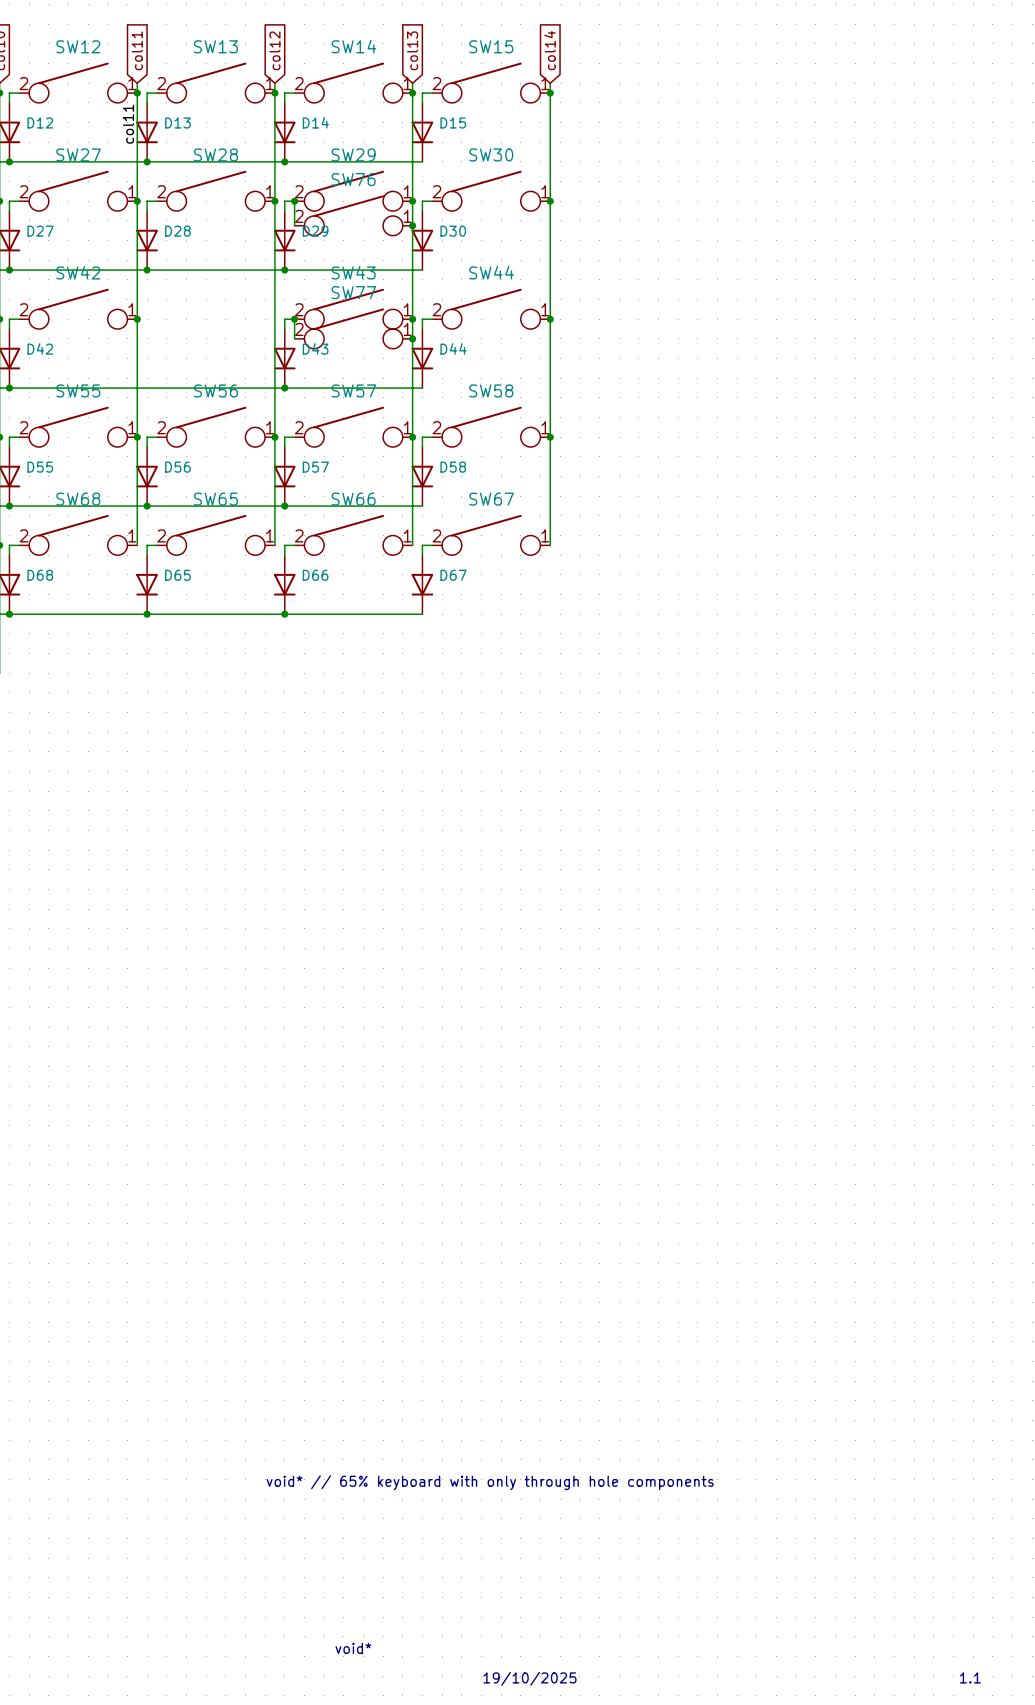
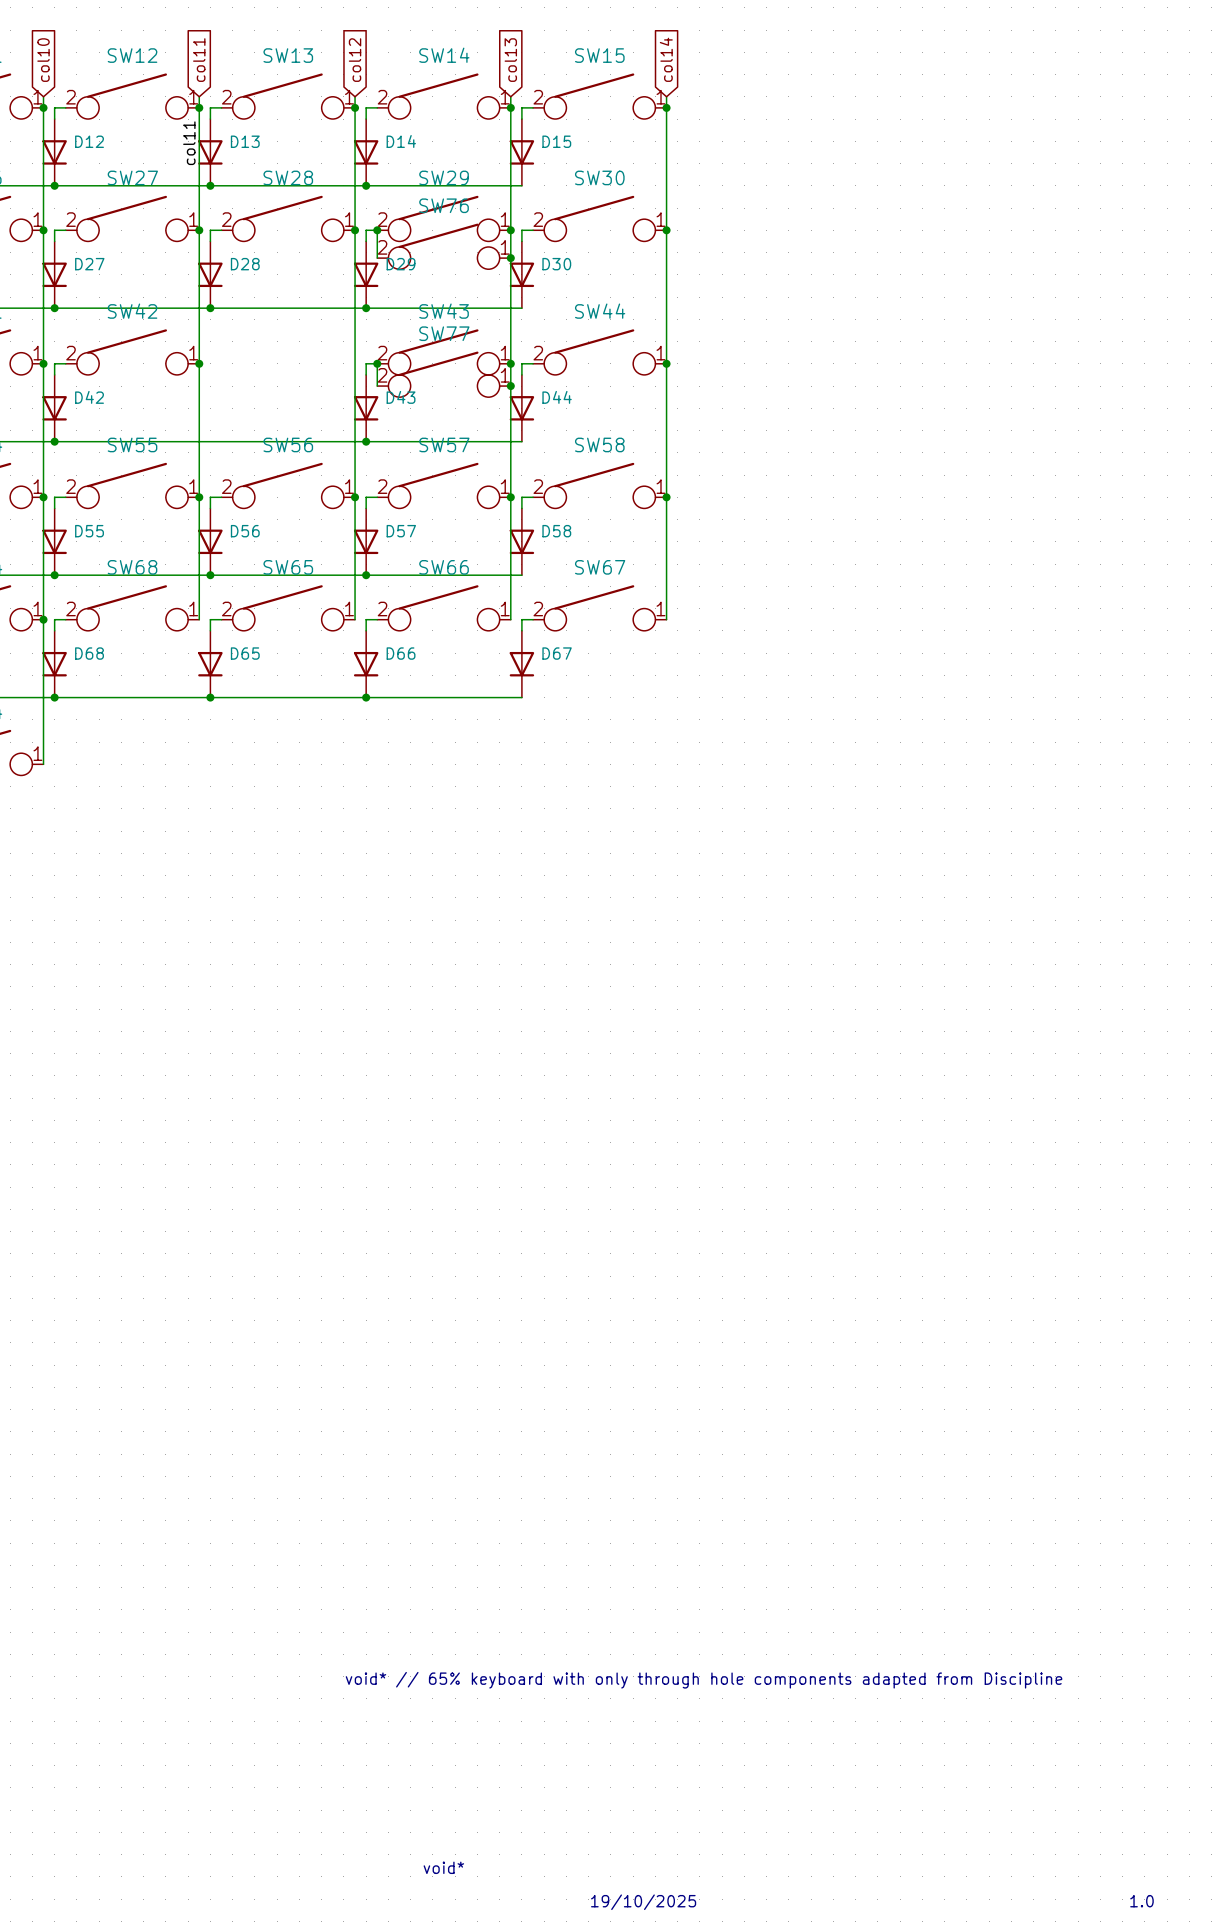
text: void* // 65% keyboard with only through hole components (490, 1482) -> void* // 65% keyboard with only through hole components adapted from Discipline (703, 1680)
text: 1.1 (970, 1677) -> 1.0 (1141, 1901)

